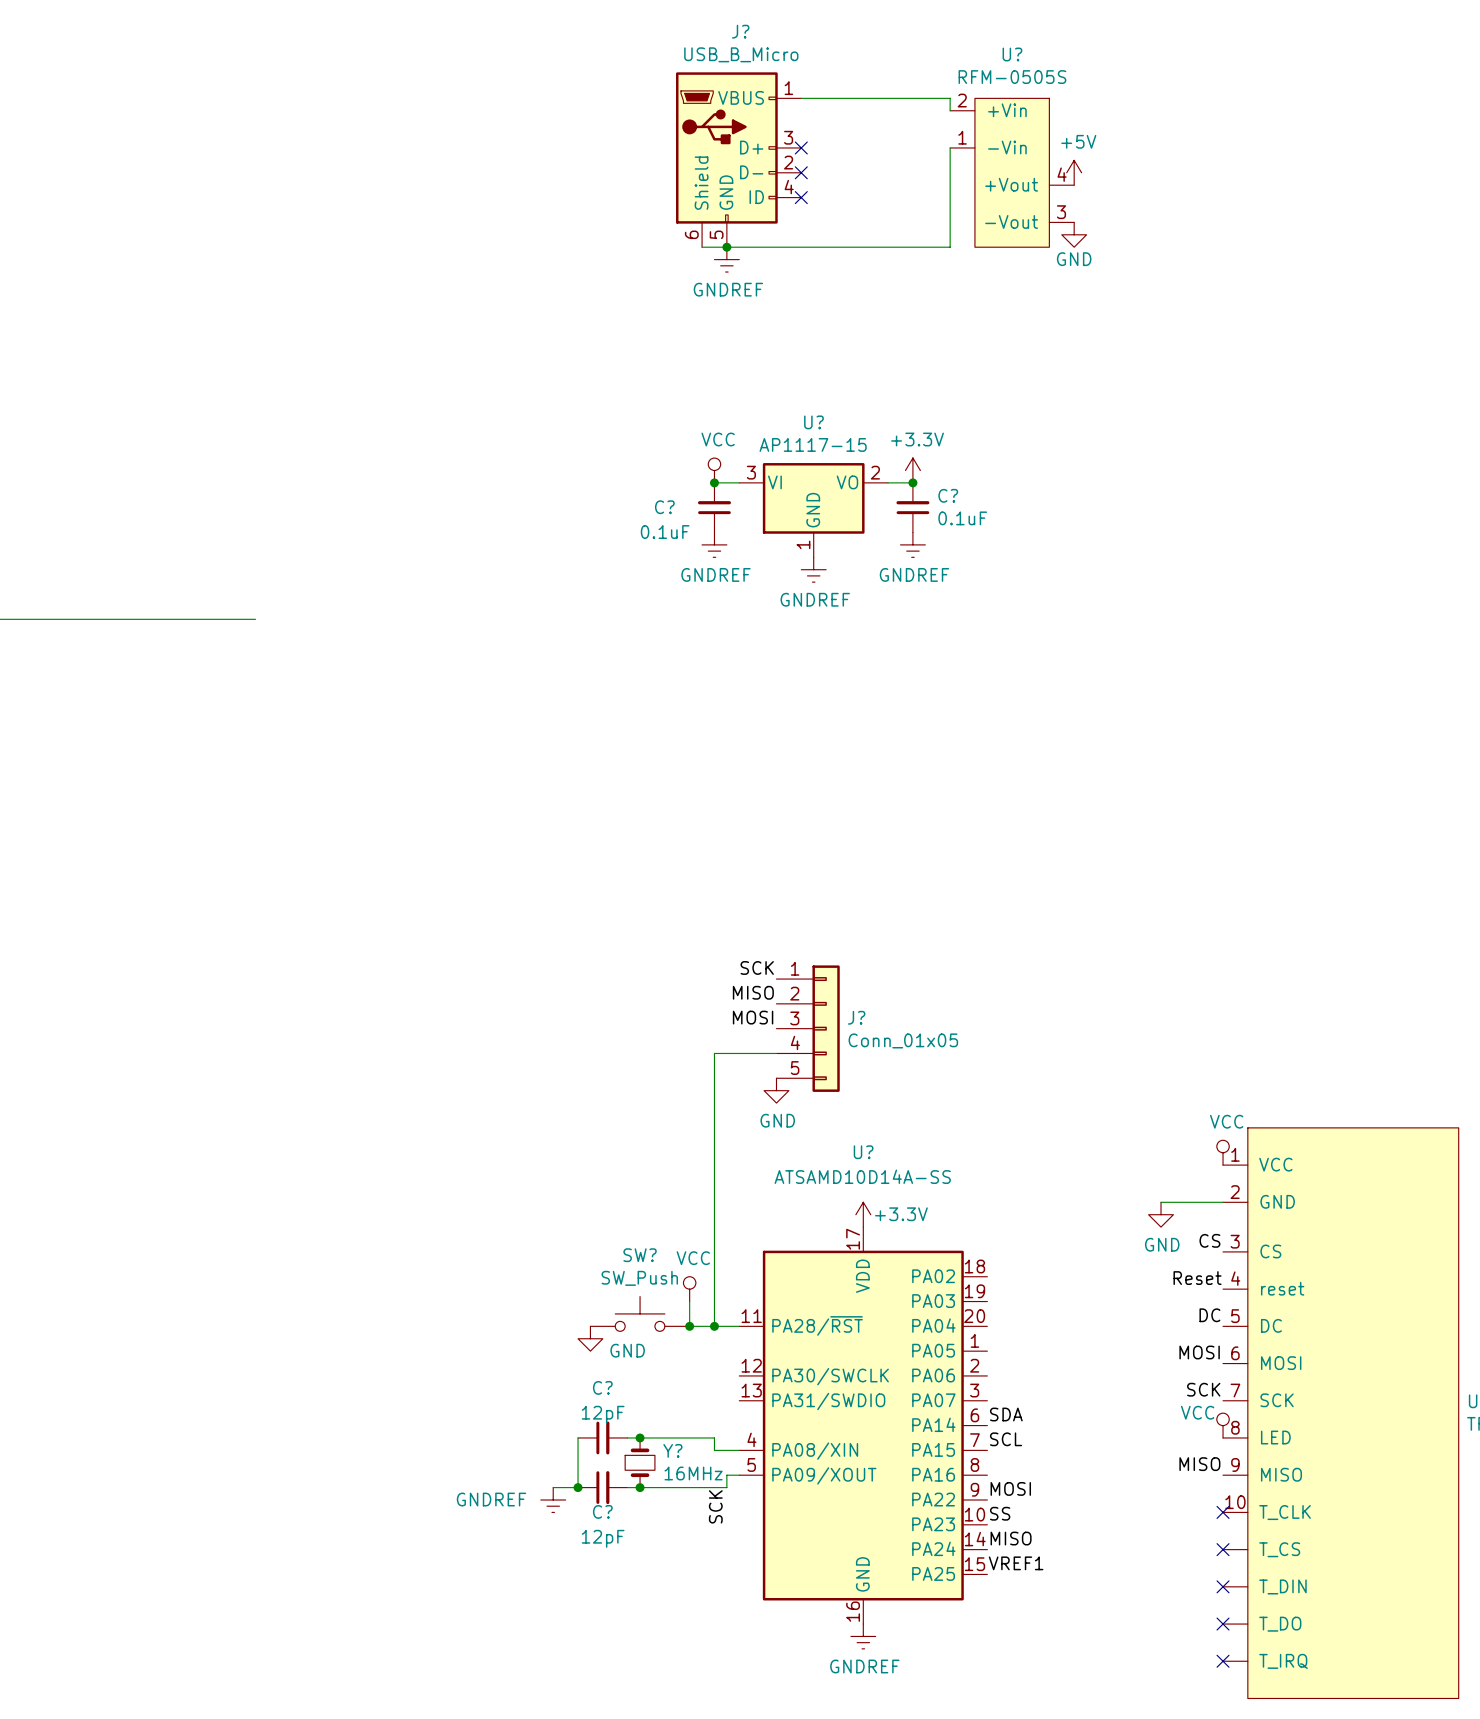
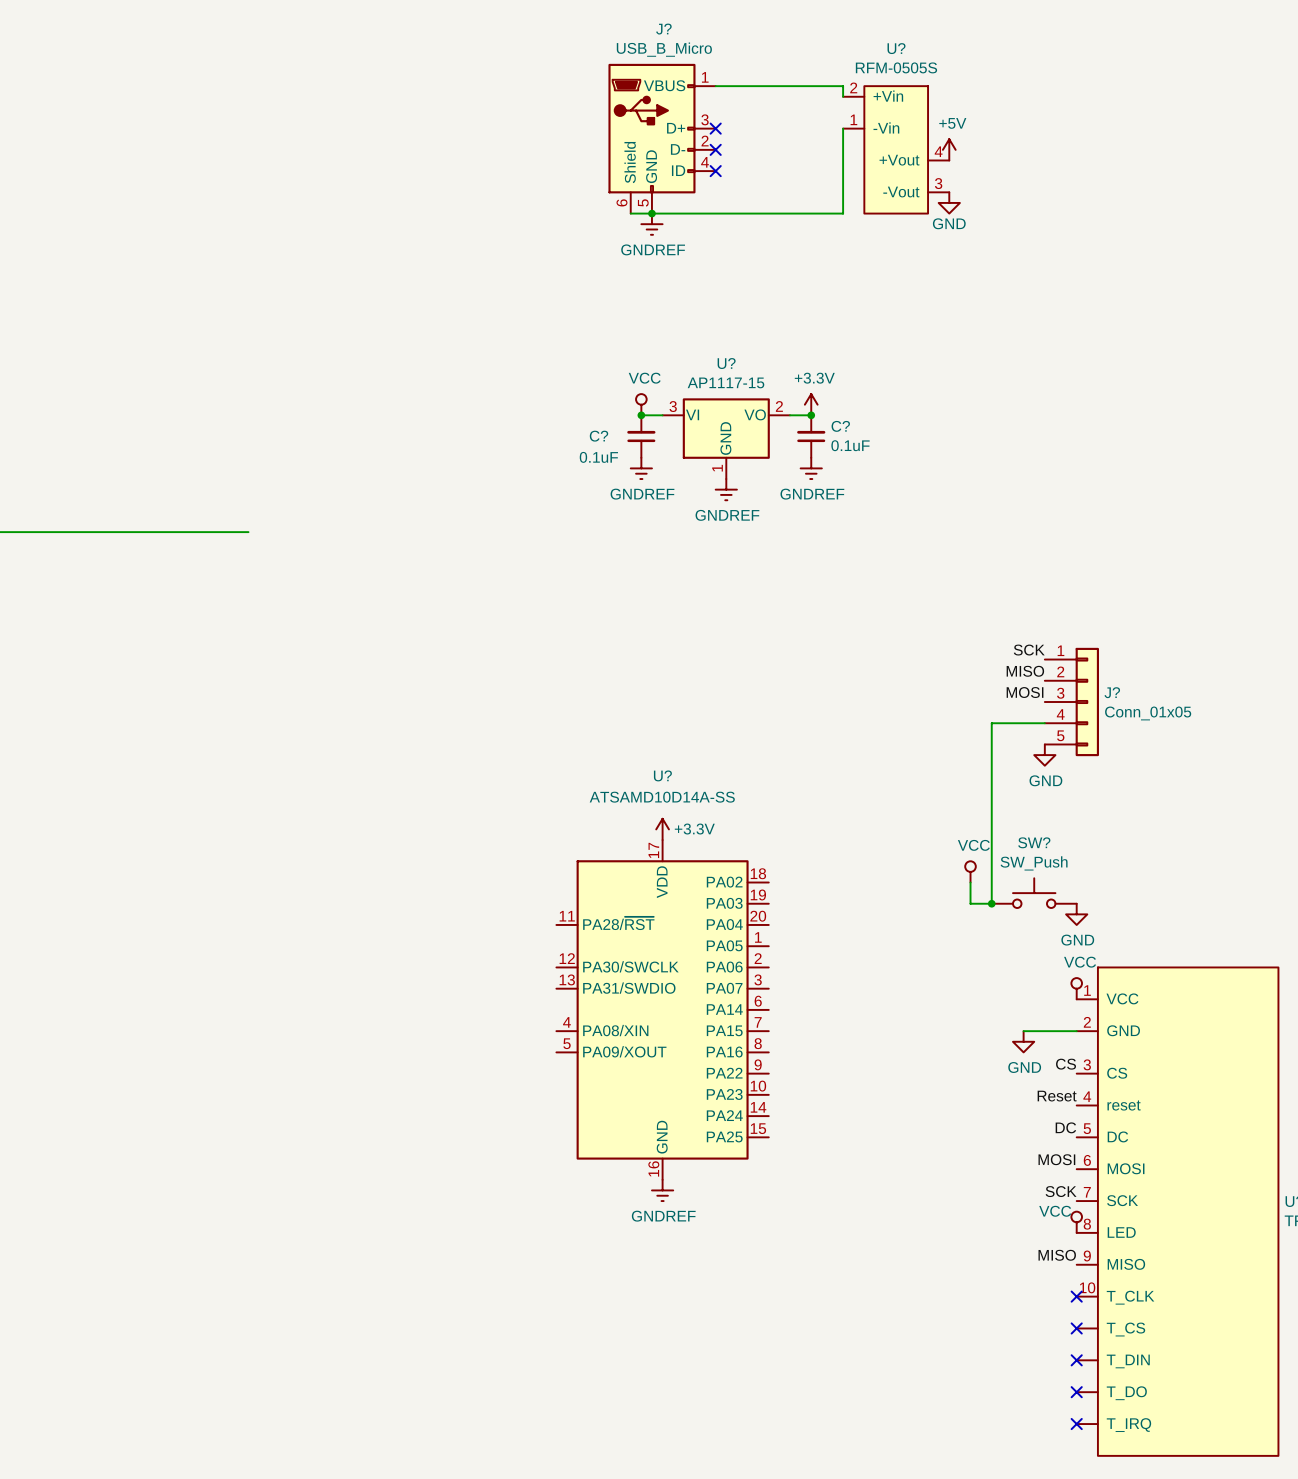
label: none -> SCK (1029, 650)
label: none -> MISO (1025, 671)
label: none -> MOSI (1025, 692)
J?: none -> Conn_01x05 (1071, 702)
wire: none -> (1044, 723) (991, 723) (991, 903) (970, 903) (970, 882)
power symbol: none -> GND (1044, 755)
power symbol: none -> +3.3V (662, 829)
label: SCK (757, 967) -> none
label: MISO (753, 992) -> none
power symbol: none -> VCC (970, 871)
label: MOSI (753, 1017) -> none
J?: Conn_01x05 (808, 1028) -> none
SW?: none -> SW_Push (1034, 893)
junction: none -> (991, 903)
power symbol: none -> GND (1076, 914)
power symbol: GND (776, 1090) -> none
U?: none -> ATSAMD10D14A-SS (662, 1009)
power symbol: +3.3V (863, 1214) -> none
power symbol: VCC (689, 1289) -> none
SW?: SW_Push (640, 1313) -> none
junction: (689, 1326) -> none
junction: (714, 1326) -> none
power symbol: GND (590, 1338) -> none
power symbol: none -> GNDREF (662, 1190)
label: SDA (1006, 1414) -> none
U?: ATSAMD10D14A-SS (863, 1425) -> none
wire: (578, 1437) (578, 1487) (553, 1487) -> none
C?: 12pF (602, 1437) -> none
wire: (627, 1437) (714, 1437) (714, 1450) (739, 1450) -> none
junction: (640, 1437) -> none
label: SCL (1006, 1439) -> none
Y?: 16MHz (640, 1462) -> none
wire: (739, 1475) (726, 1475) (726, 1487) (627, 1487) -> none
junction: (578, 1487) -> none
C?: 12pF (602, 1487) -> none
junction: (640, 1487) -> none
label: MOSI (1010, 1488) -> none
power symbol: GNDREF (553, 1500) -> none
label: SCK (715, 1506) -> none
label: SS (1000, 1513) -> none
label: MISO (1011, 1538) -> none
label: VREF1 (1016, 1563) -> none
power symbol: GNDREF (863, 1636) -> none

